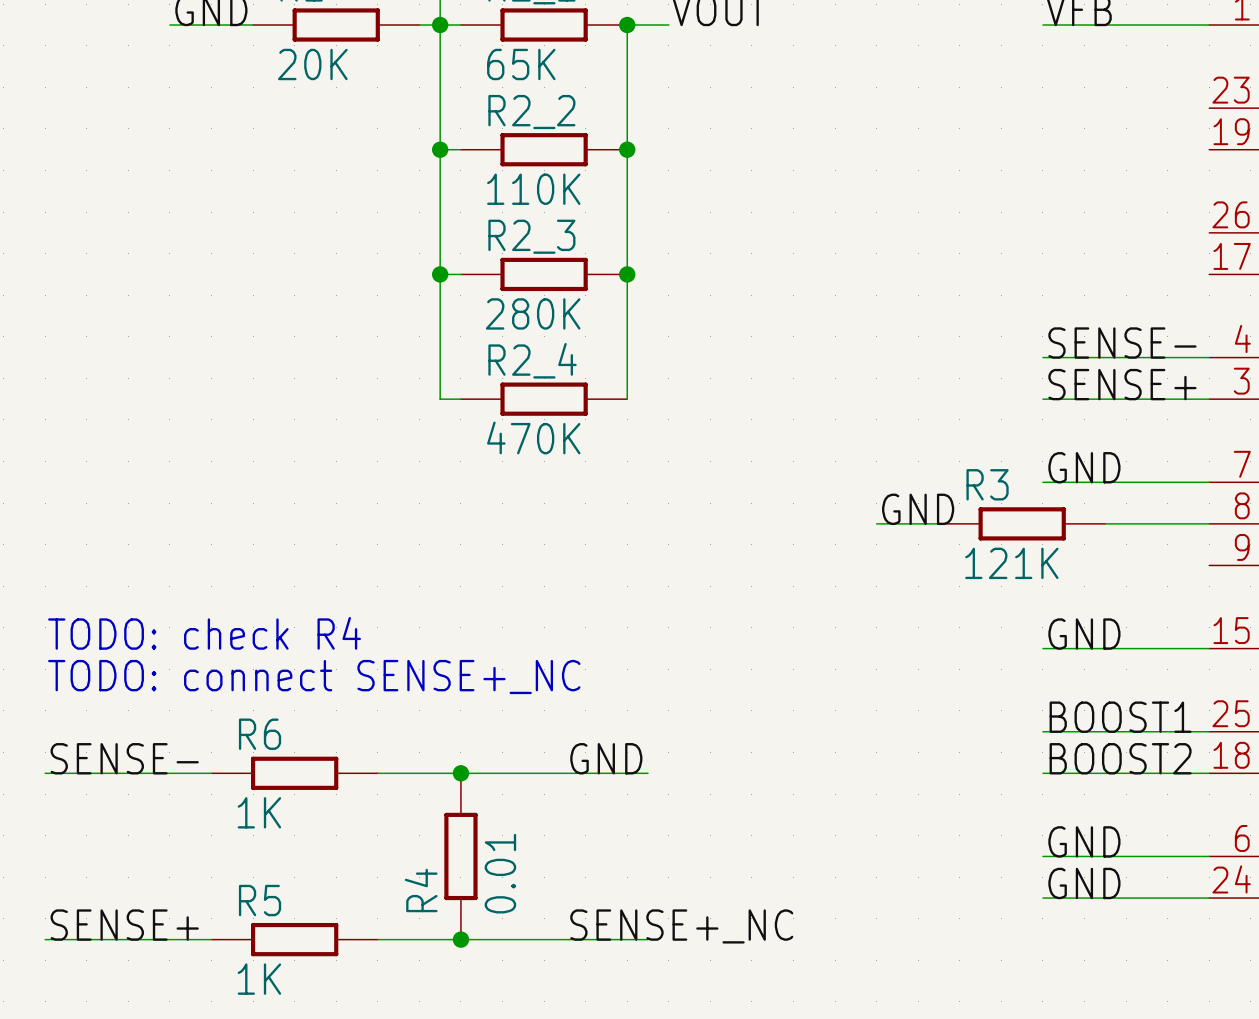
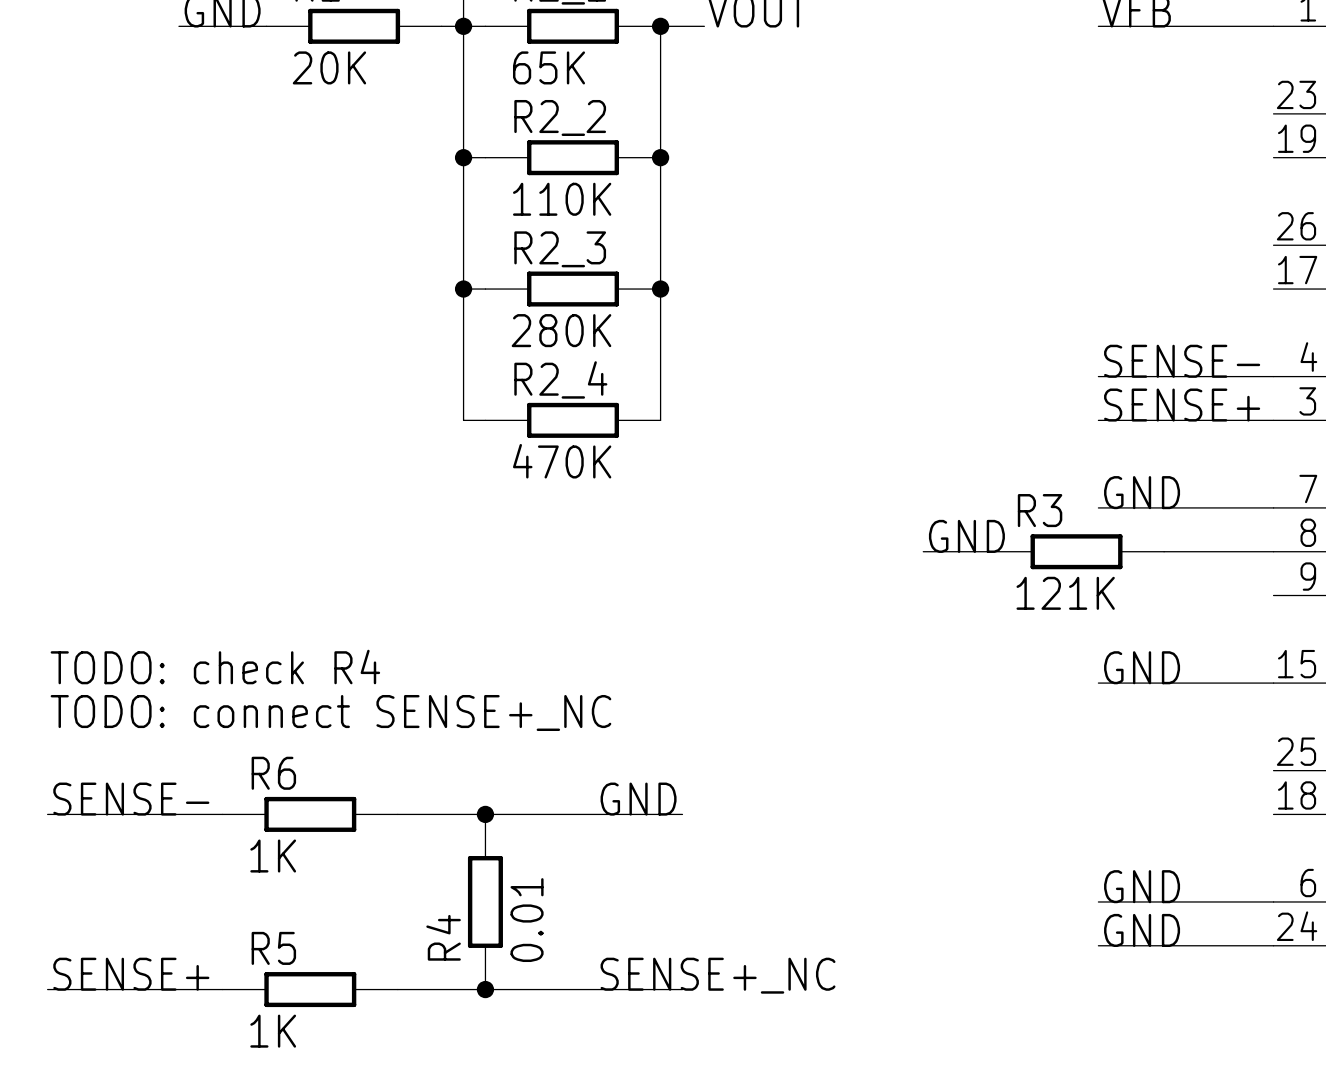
label: BOOST1 (1120, 717) -> none
wire: (1042, 731) (1209, 731) -> none
label: BOOST2 (1120, 758) -> none
wire: (1042, 773) (1209, 773) -> none

